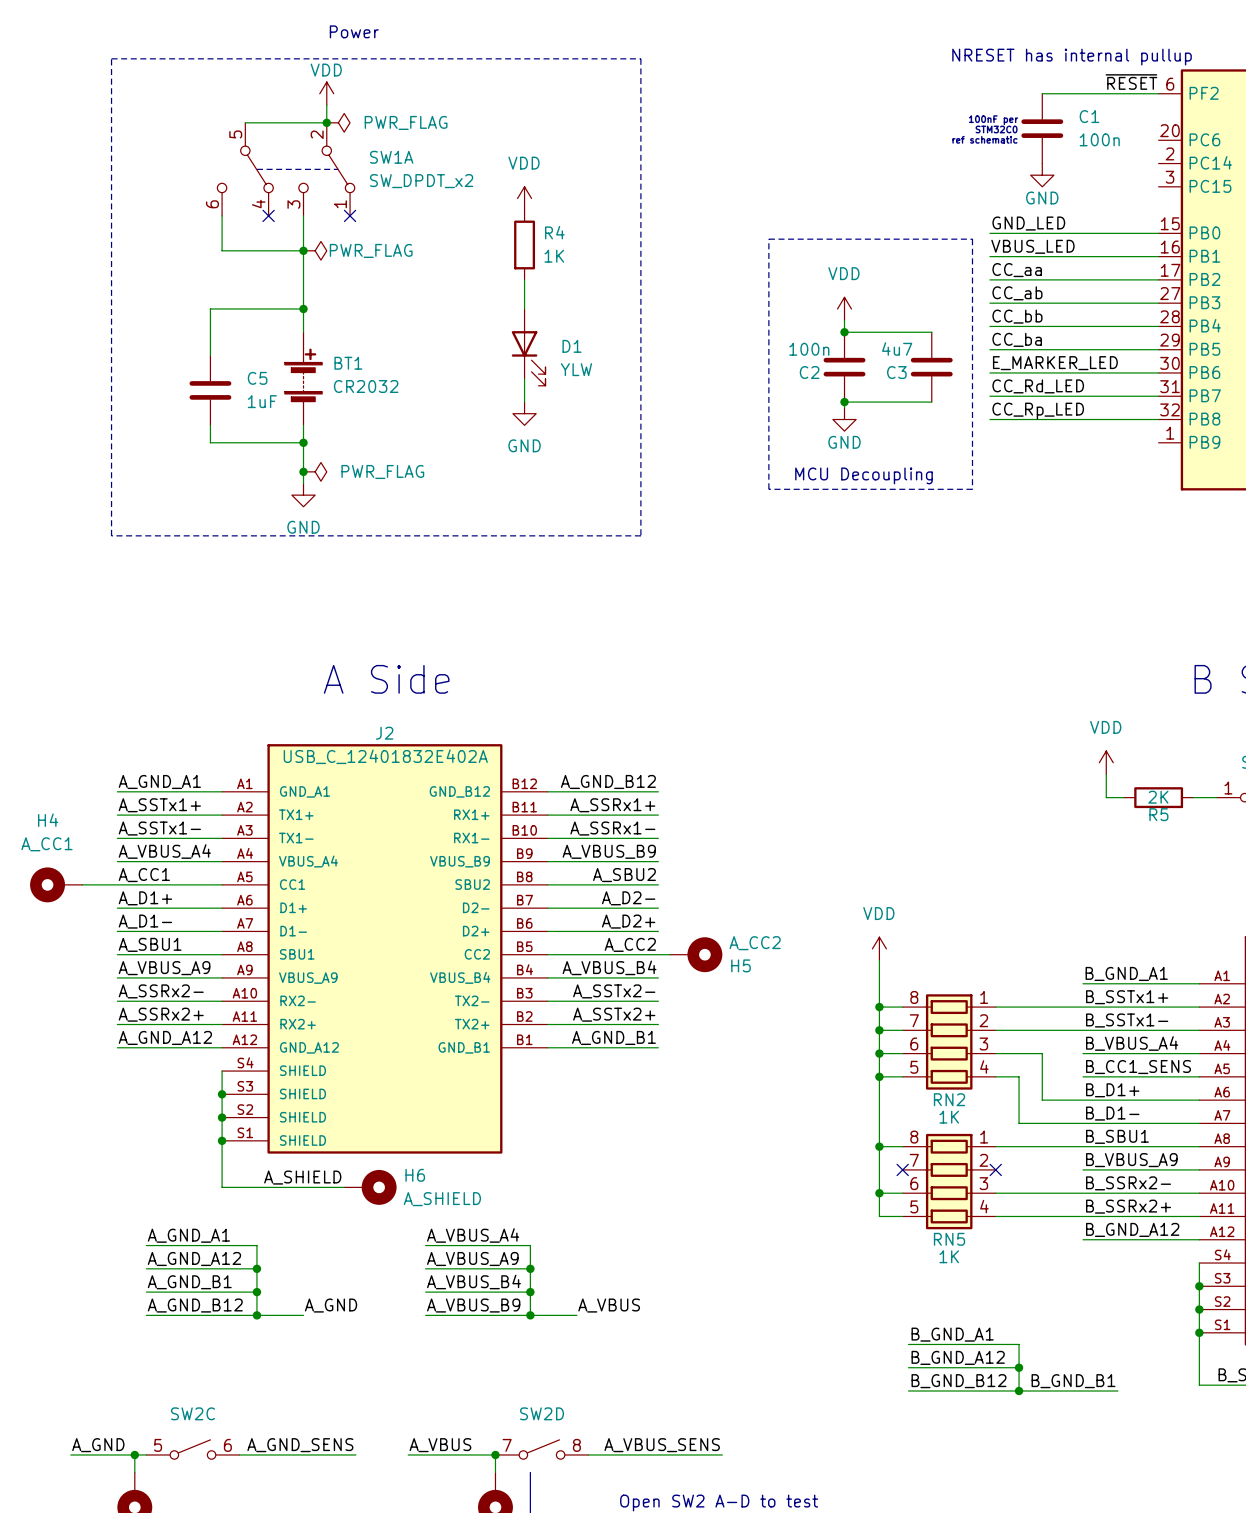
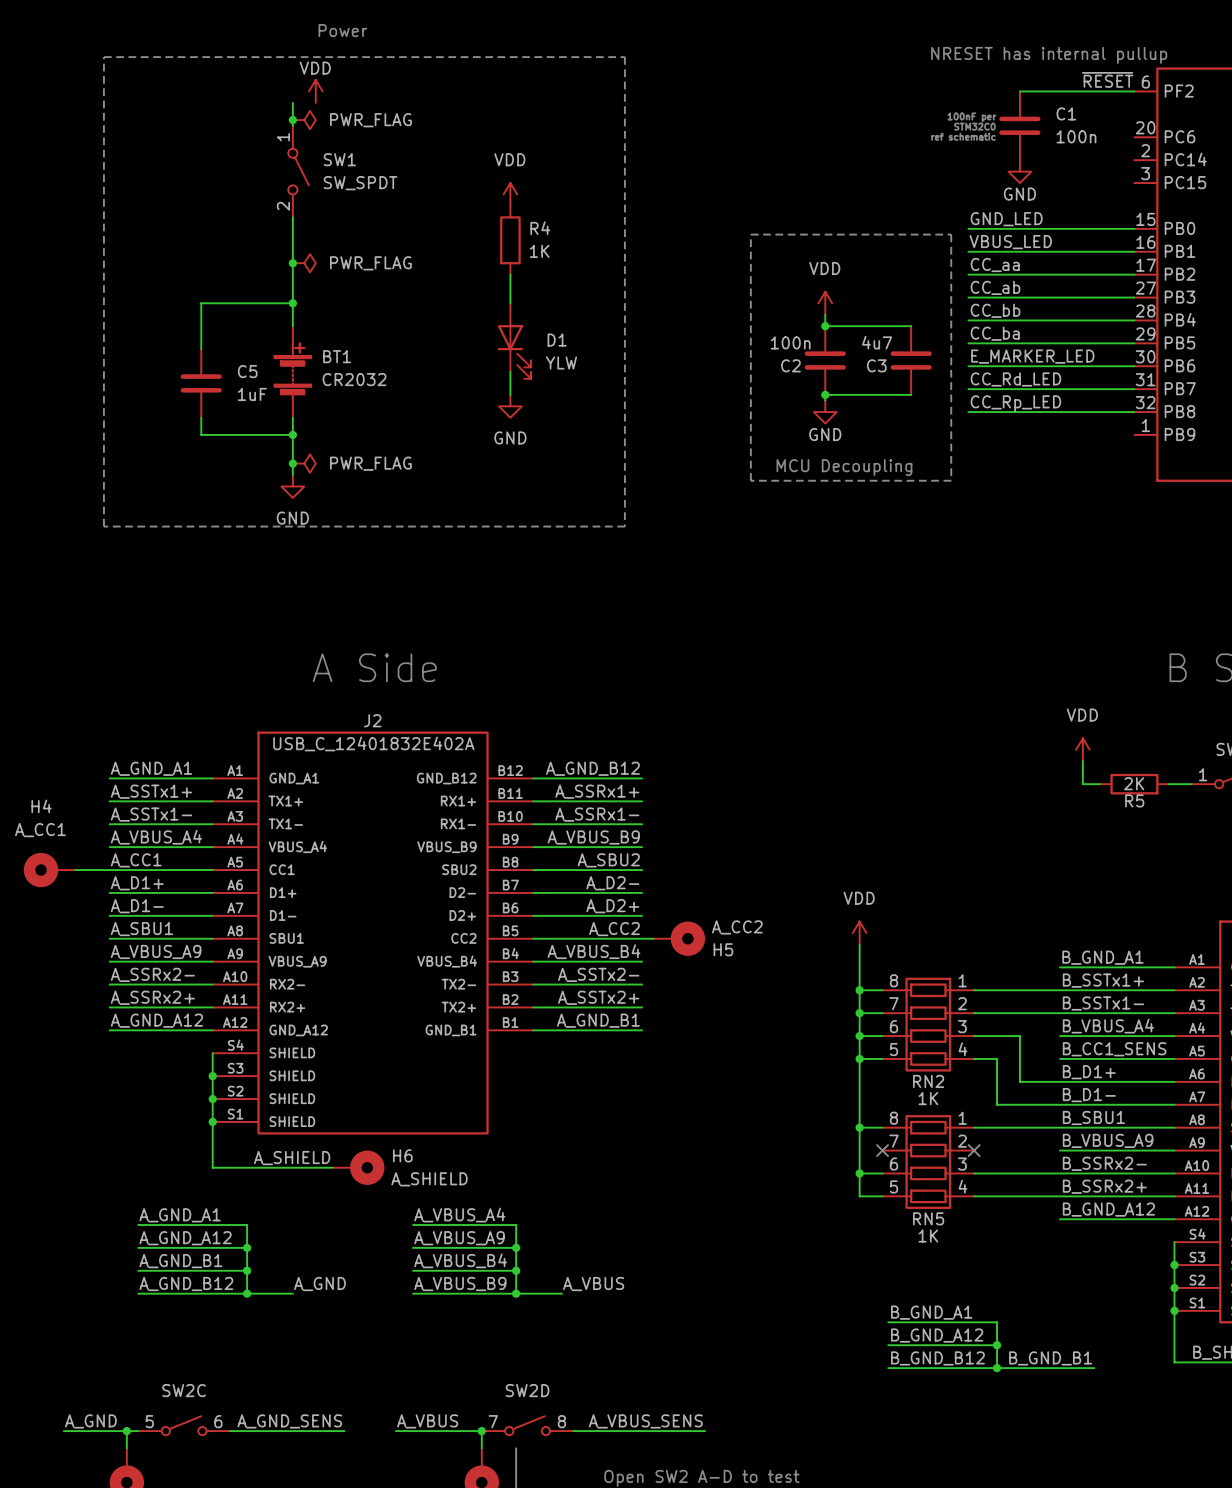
wire: none -> (292, 102) (292, 125)
wire: (326, 105) (326, 122) (245, 122) -> none
junction position: (326, 122) -> (292, 120)
power symbol position: PWR_FLAG (338, 122) -> PWR_FLAG (304, 120)
part: (245, 169) -> none
line: (256, 169) (338, 169) -> none
SW1A: SW_DPDT_x2 (326, 169) -> none
SW1: none -> SW_SPDT (298, 171)
wire: (222, 215) (222, 250) (303, 250) -> none
no-connect mark: (268, 215) -> none
no-connect mark: (350, 215) -> none
junction position: (303, 250) -> (292, 263)
power symbol position: PWR_FLAG (315, 250) -> PWR_FLAG (304, 263)
power symbol text position: PWR_FLAG (371, 250) -> PWR_FLAG (370, 263)

